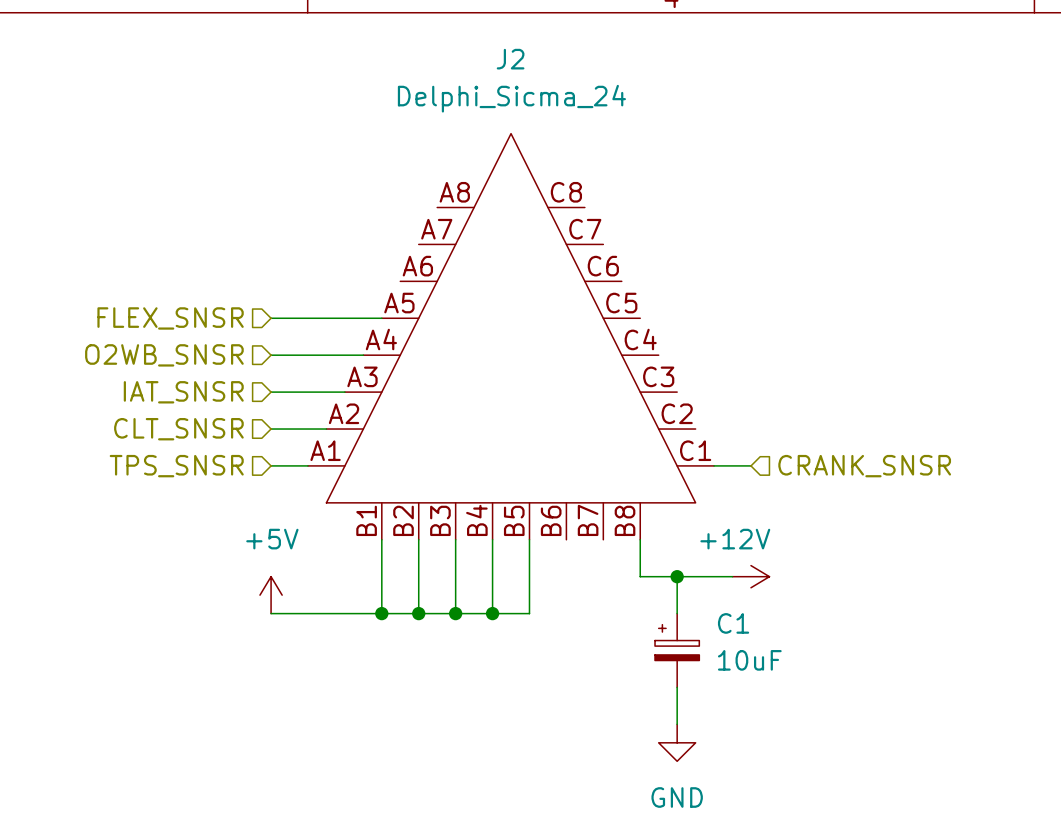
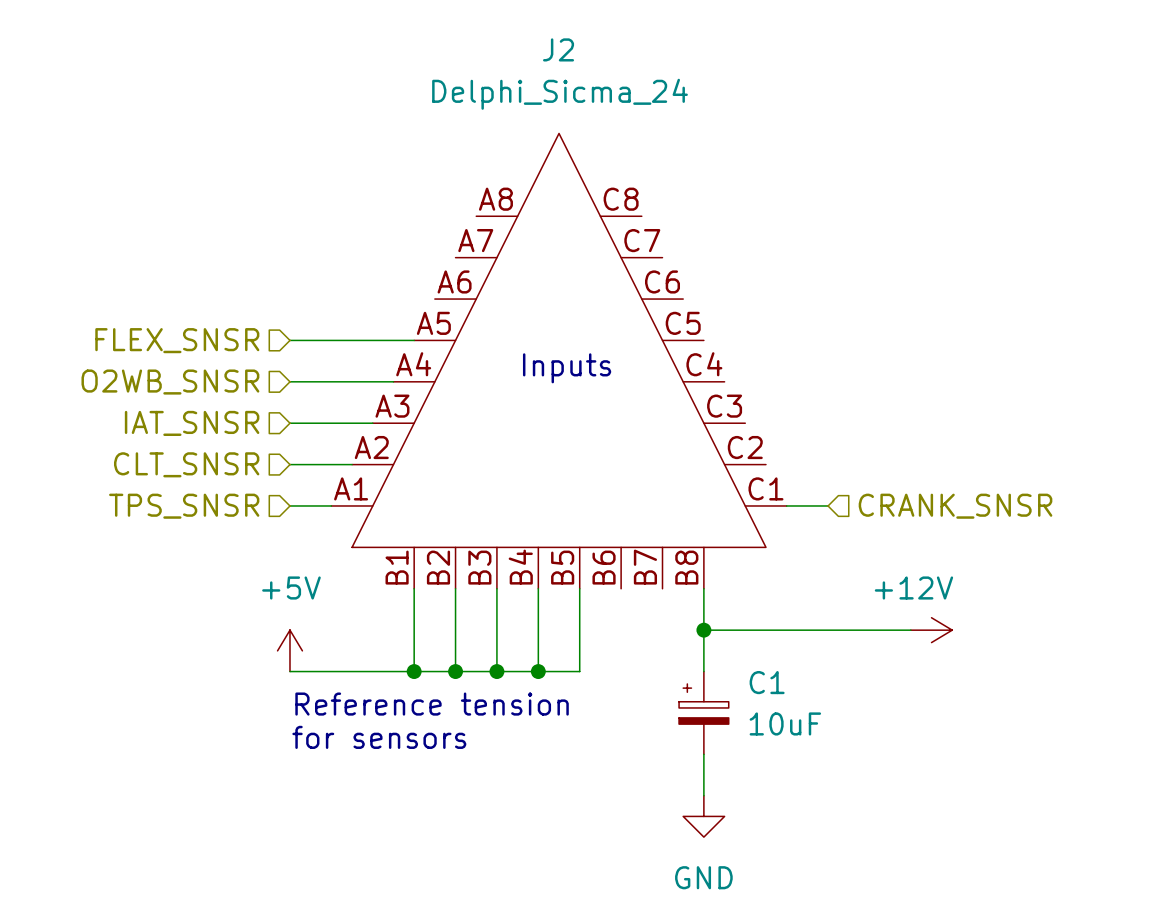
text: none -> Inputs (567, 368)
wire: (677, 576) (677, 613) -> (703, 630) (703, 671)
junction position: (677, 576) -> (703, 630)
wire: none -> (807, 630) (910, 630)
power symbol position: +12V (750, 576) -> +12V (931, 630)
text: none -> Reference tension (432, 704)
C1 position: (677, 650) -> (703, 712)
text: none -> for sensors (379, 737)
wire: (677, 687) (677, 724) -> (703, 754) (703, 795)
power symbol position: GND (677, 742) -> GND (703, 816)

